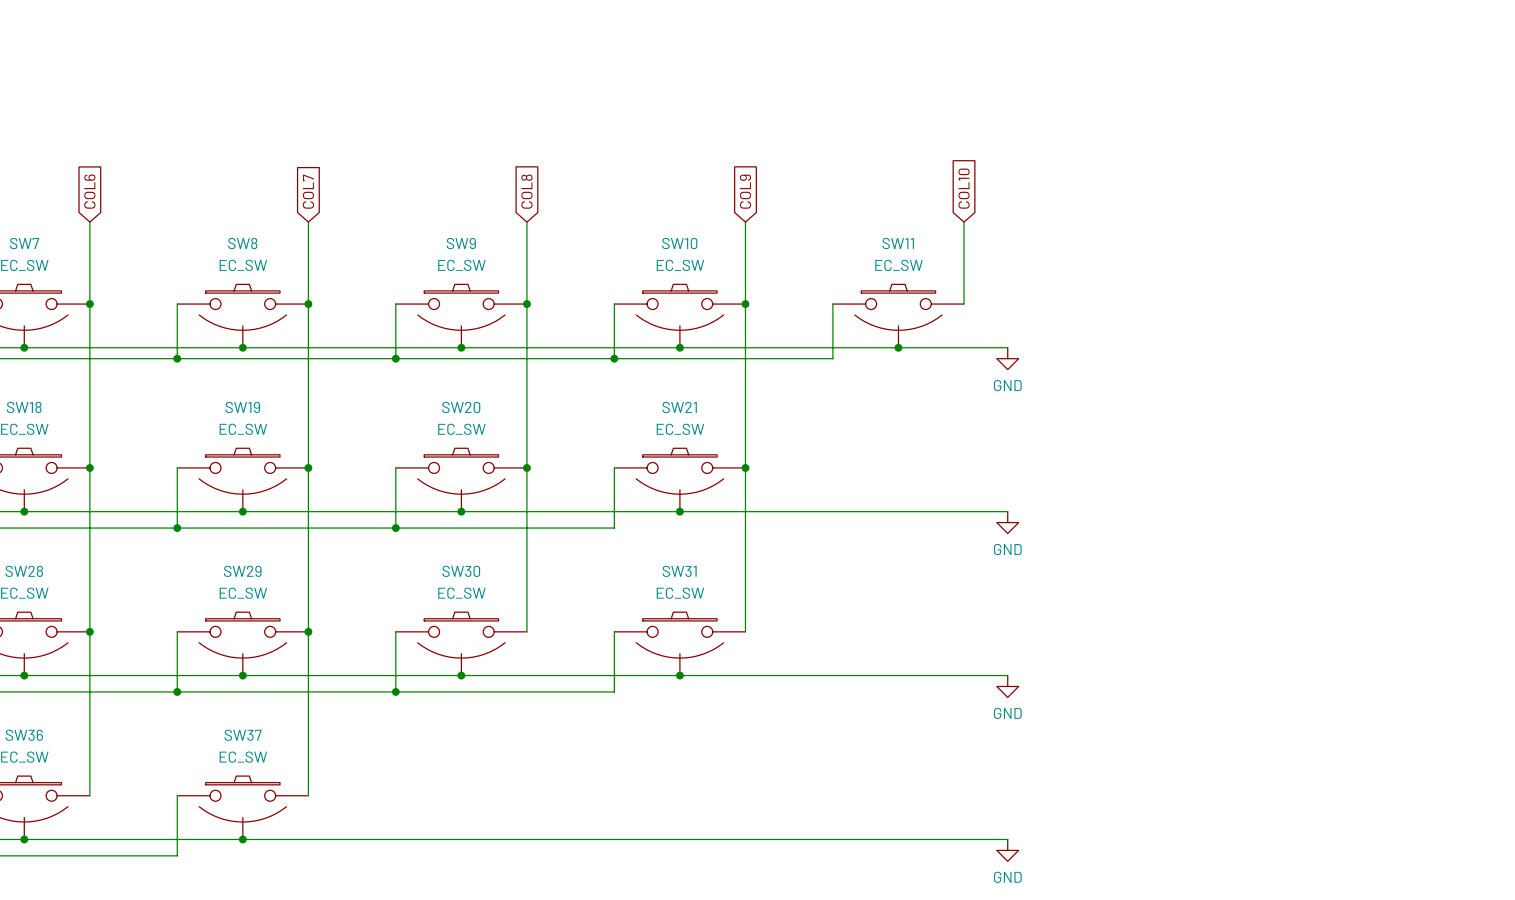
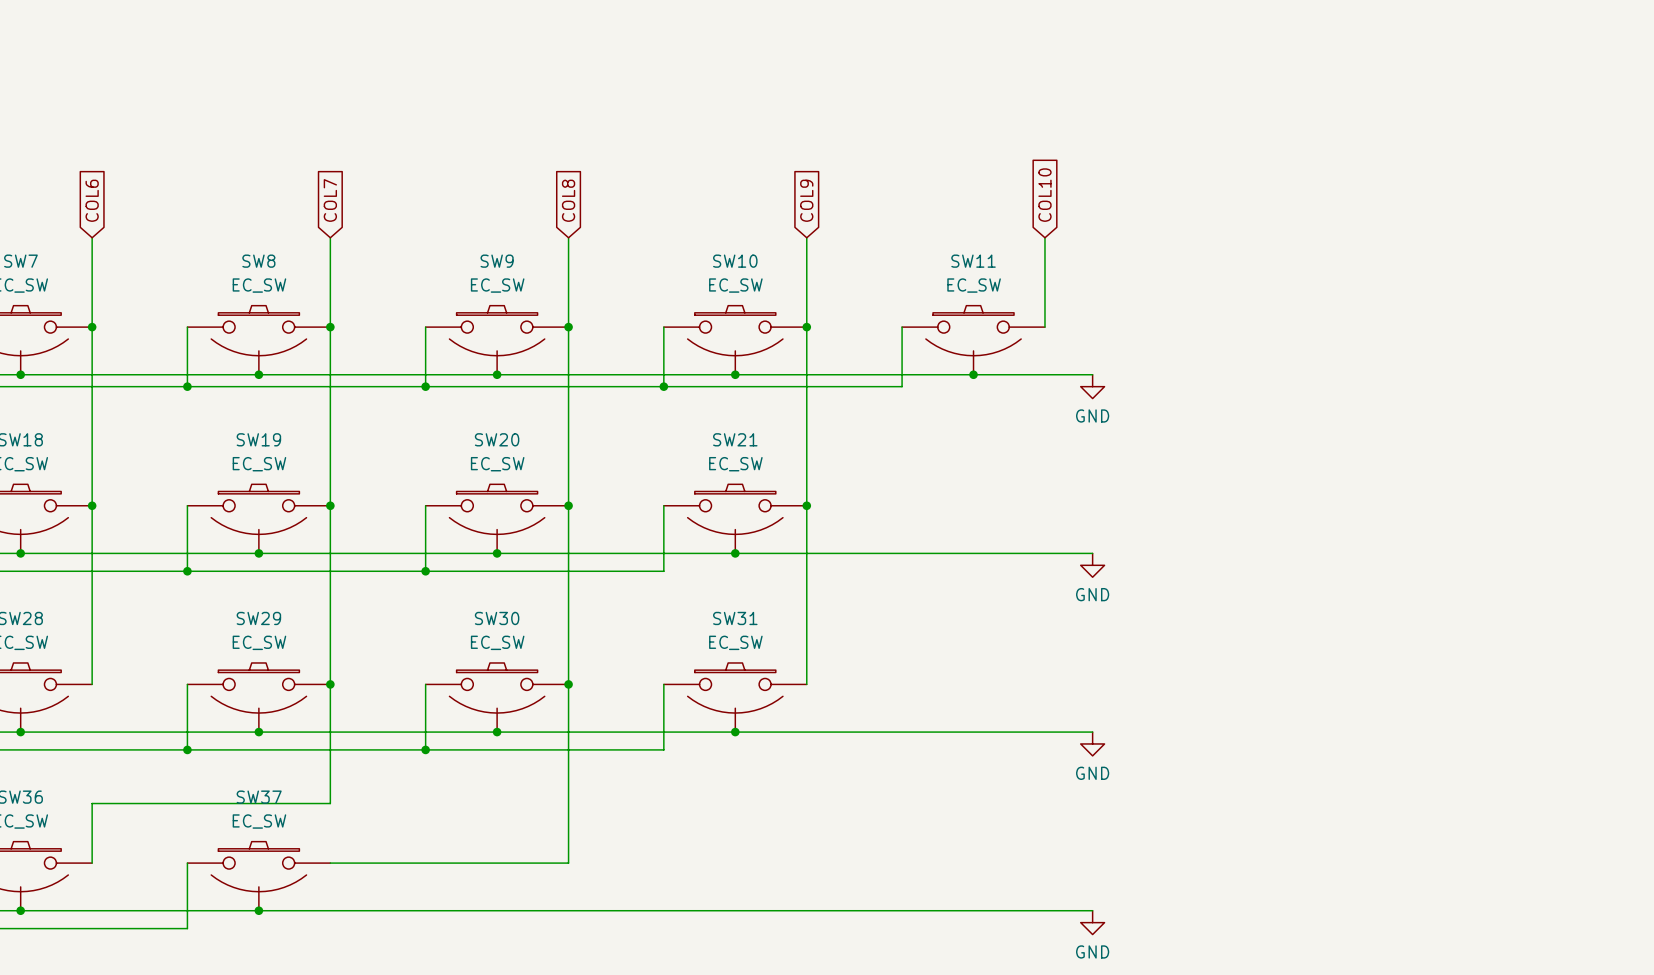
wire: (89, 631) (89, 741) -> none
junction: (89, 631) -> none
wire: none -> (568, 684) (568, 863) (330, 863)
junction: none -> (568, 684)
wire: (308, 741) (308, 795) -> (330, 803) (92, 803)

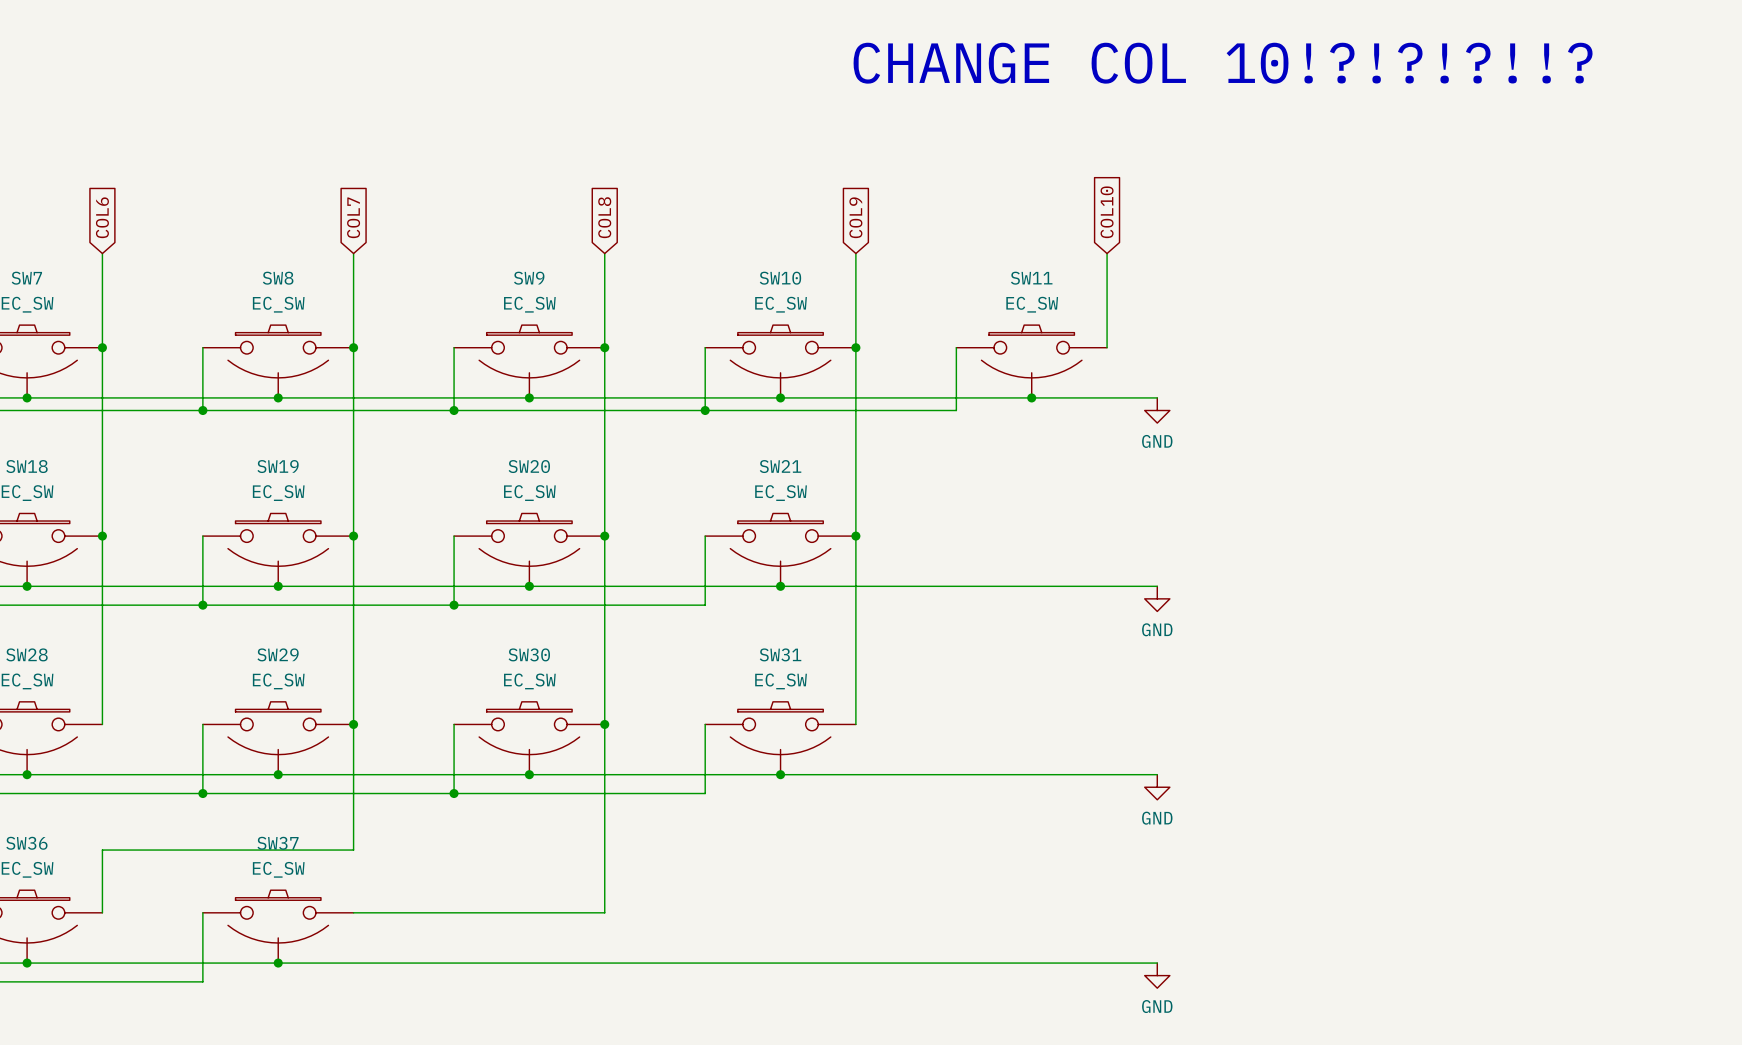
text: none -> CHANGE COL 10!?!?!?!!? (1223, 63)

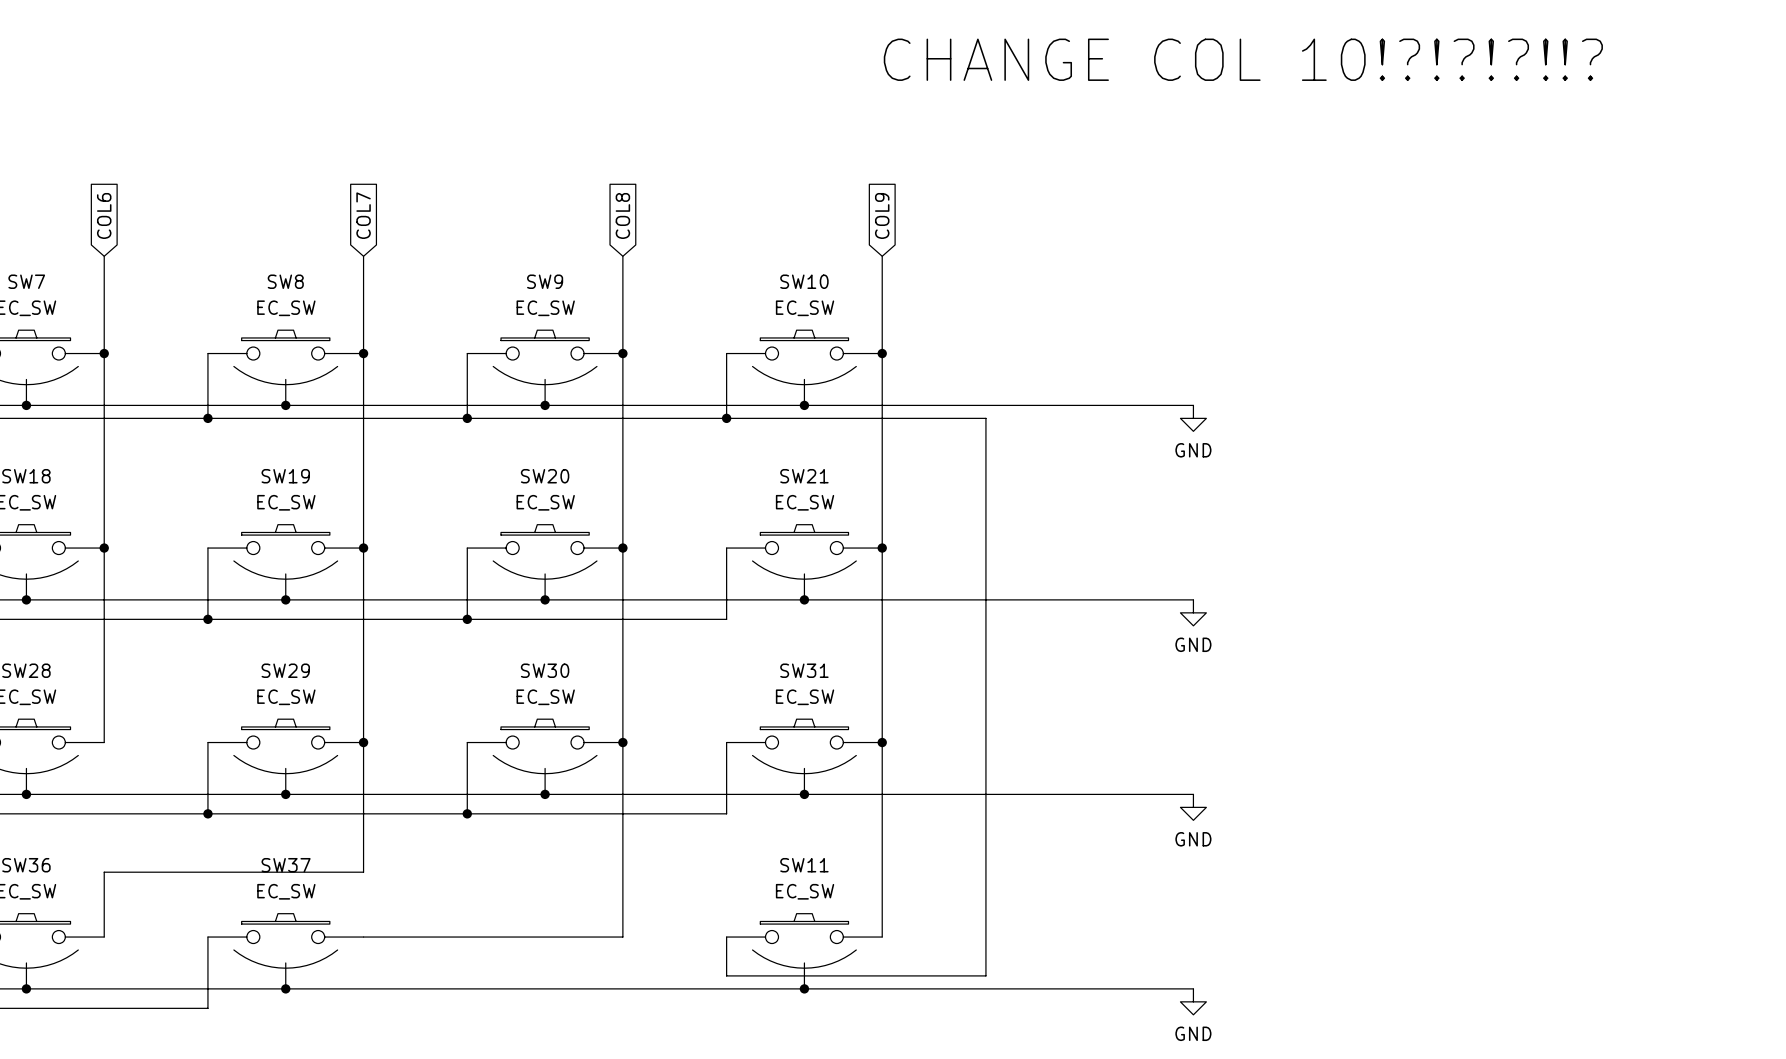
global label: COL10 (1107, 212) -> none
wire: (1107, 253) (1107, 347) -> none
wire: (956, 347) (956, 410) -> (726, 937) (726, 975) (985, 975) (985, 418)
SW11 position: (1031, 361) -> (804, 951)
junction: (1031, 397) -> none
wire: none -> (882, 742) (882, 937)
junction: none -> (882, 742)
junction: none -> (804, 988)

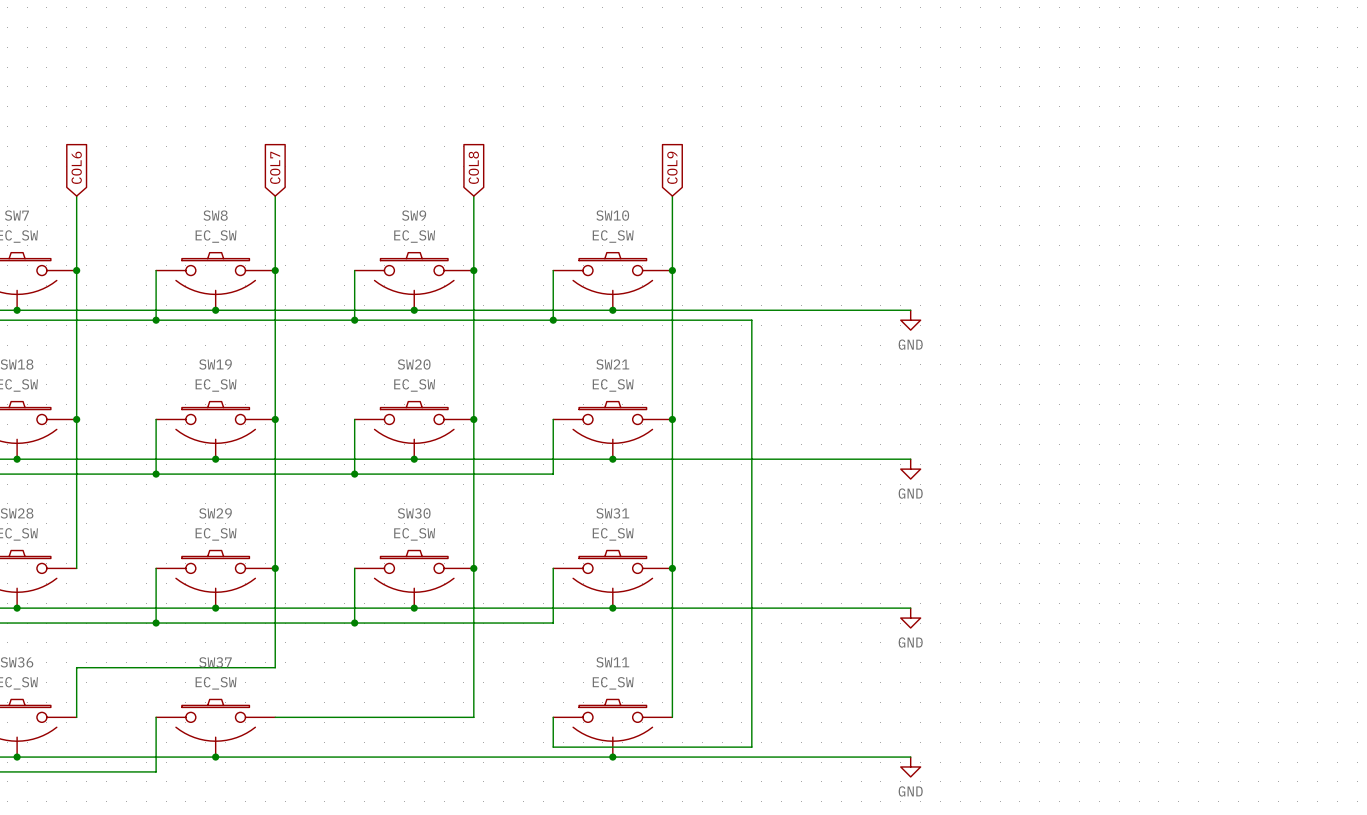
text: CHANGE COL 10!?!?!?!!? (1243, 59) -> none

